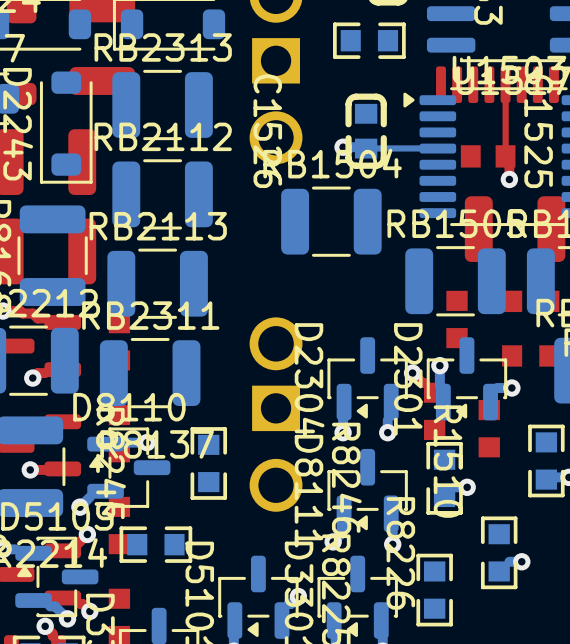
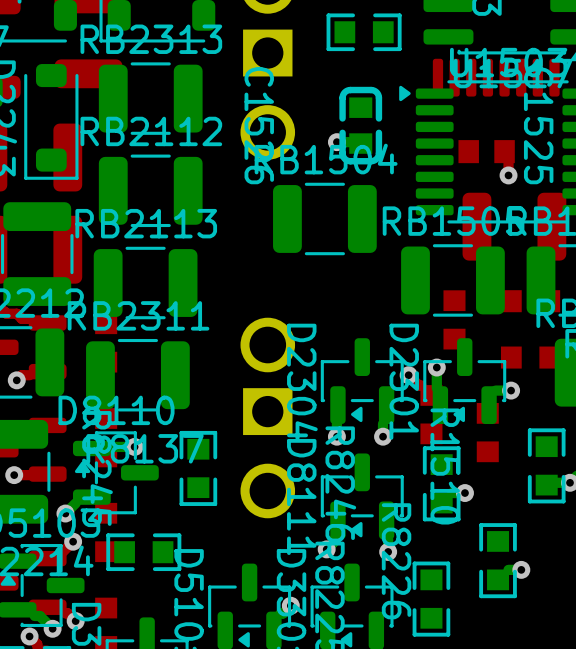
top track: (505, 102) (505, 145) -> none
bottom track: (420, 148) (376, 148) -> none

